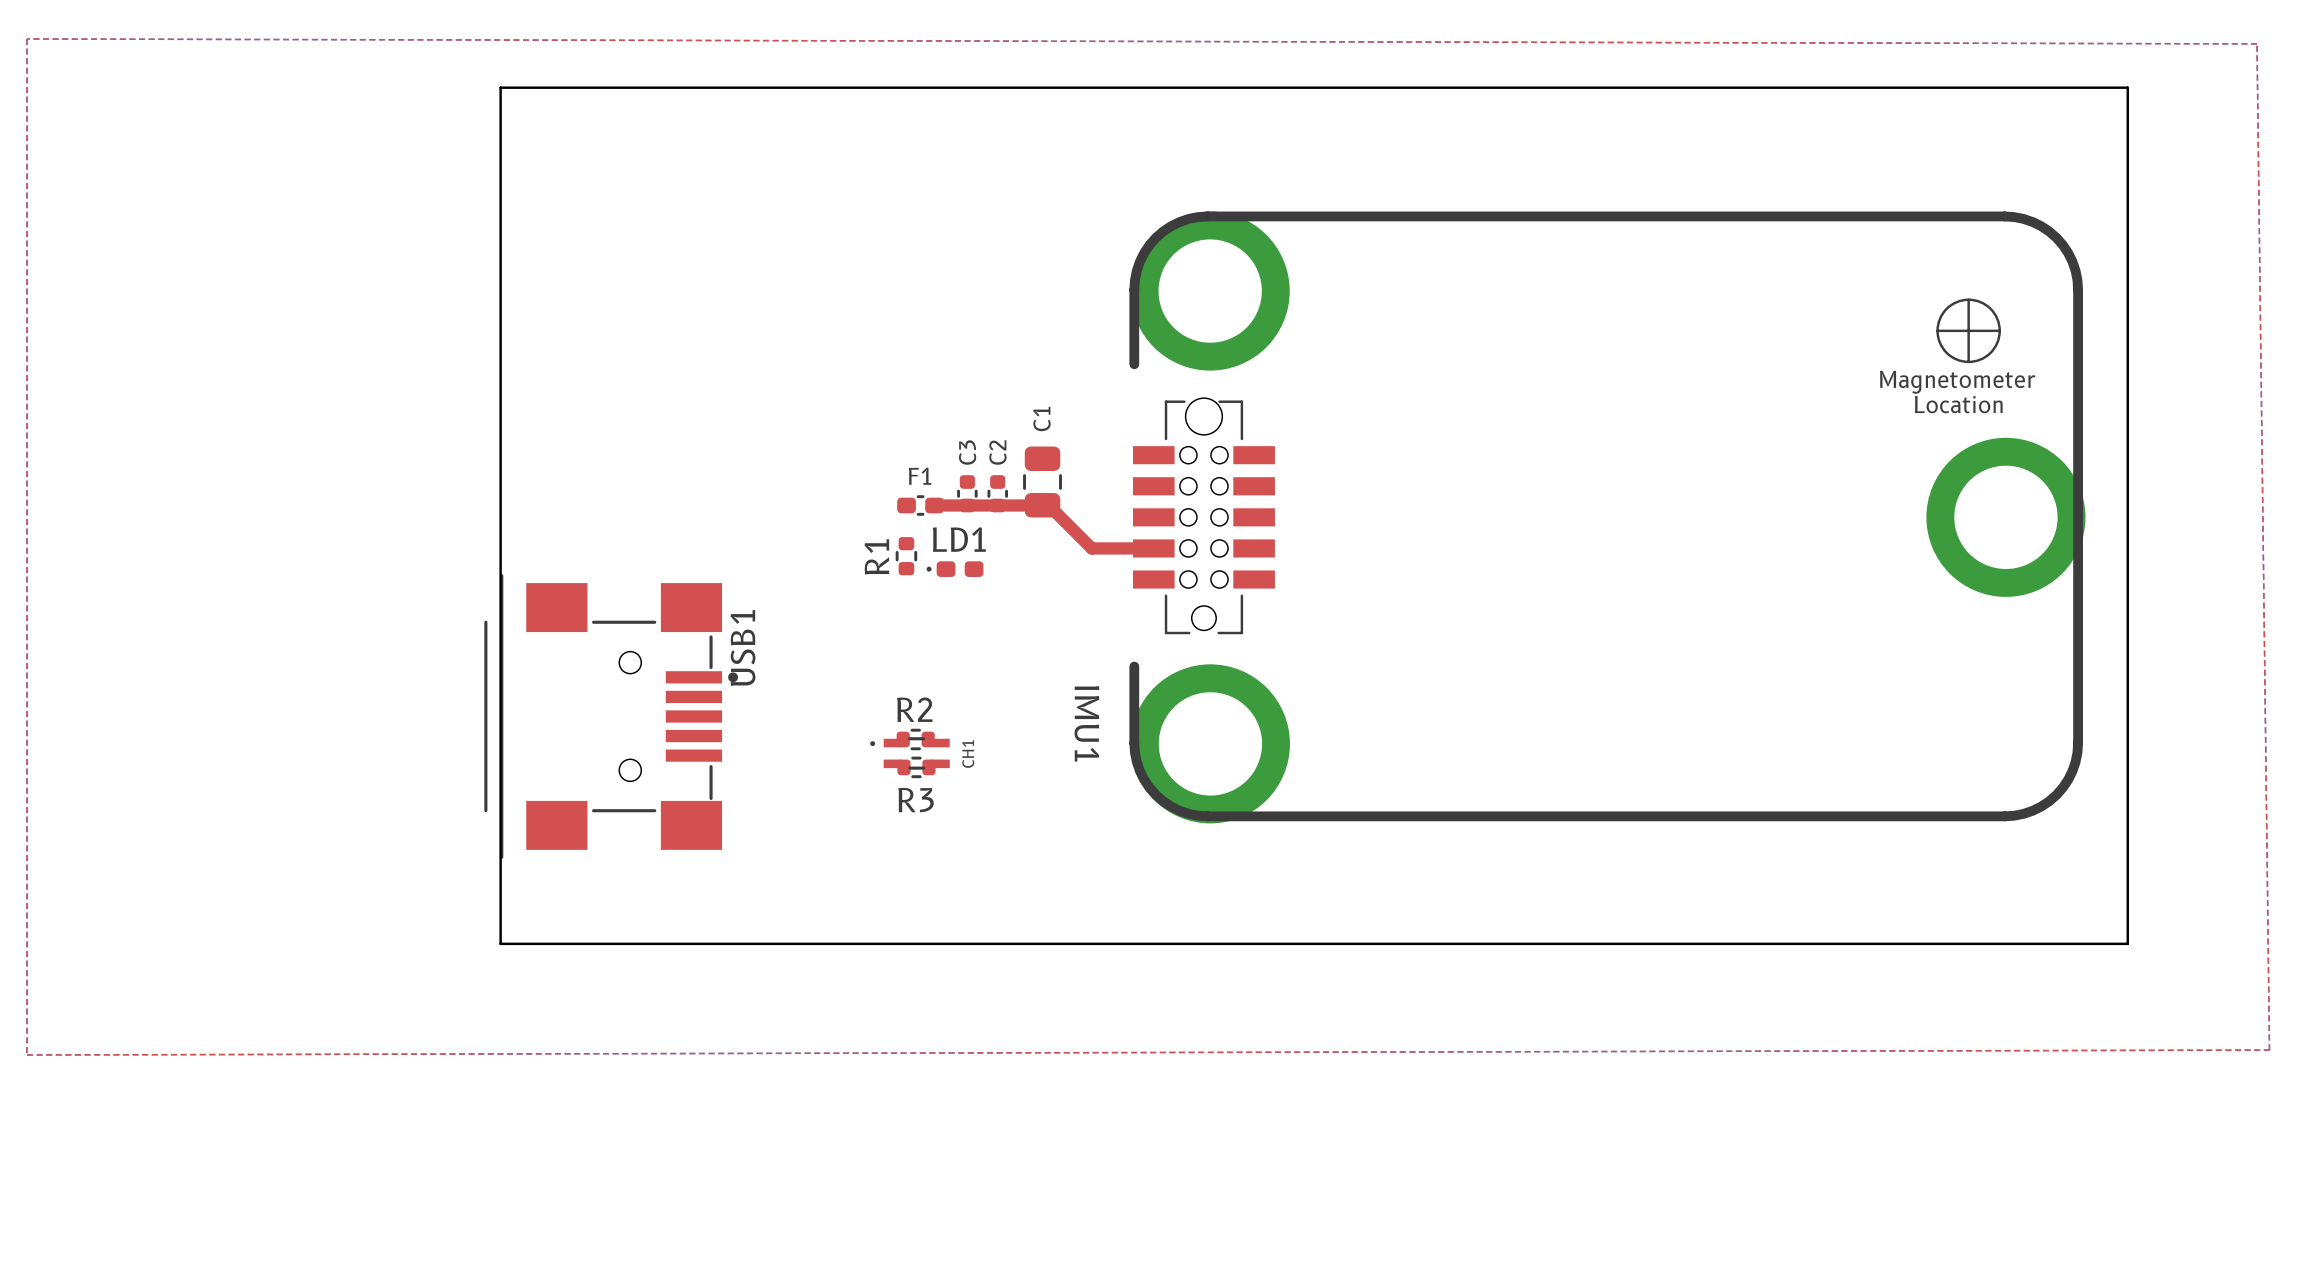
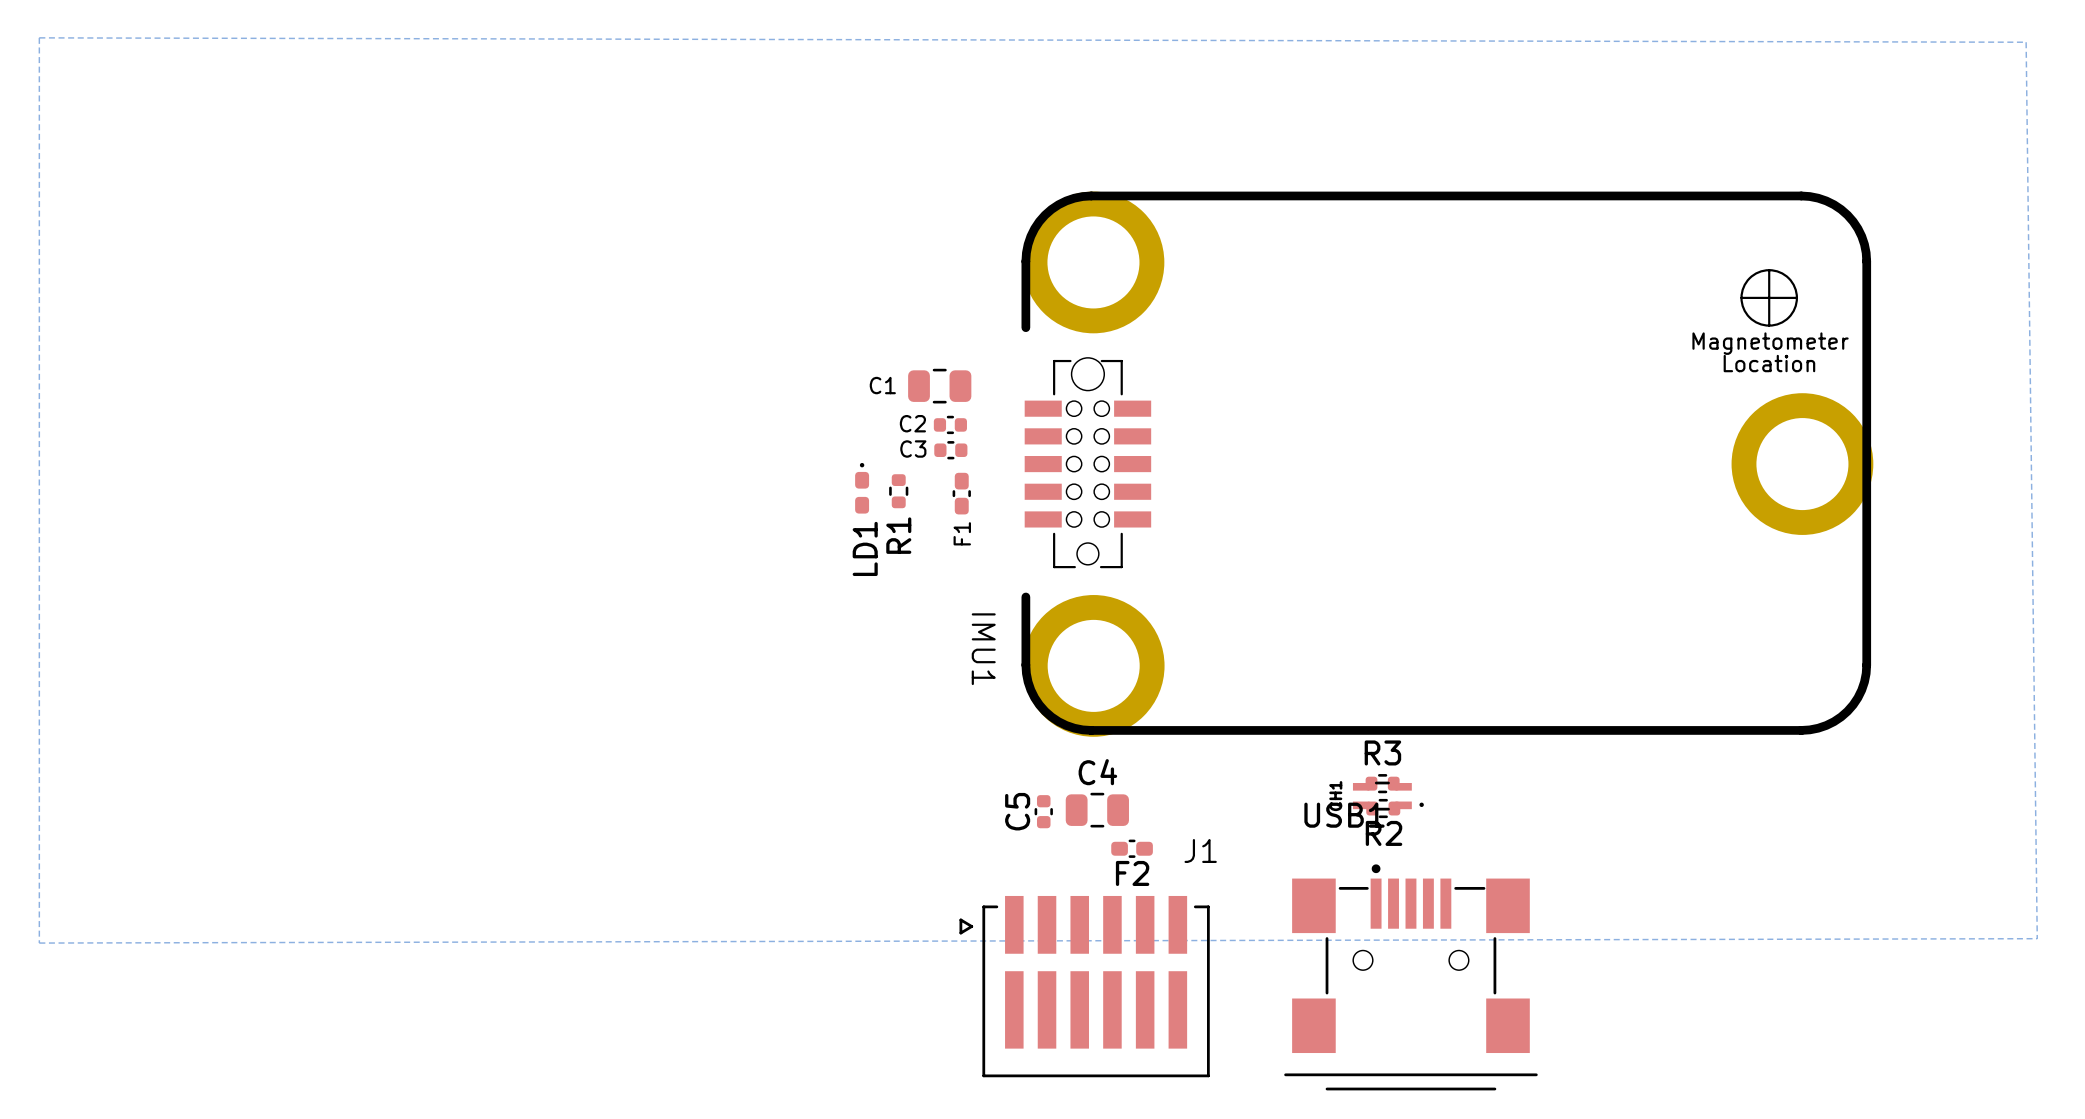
top zone outline: (27, 38) (27, 1054) (2269, 1050) (2257, 43) (27, 38) -> none
board edge: (500, 87) (2127, 87) (2127, 943) (500, 943) (500, 87) -> none
C1 name position: C1 (1041, 419) -> C1 (882, 385)
C3 name position: C3 (967, 452) -> C3 (913, 449)
C2 name position: C2 (997, 452) -> C2 (912, 423)
F1 name position: F1 (920, 476) -> F1 (962, 533)
C1 rotation: 0° (1042, 482) -> 90° clockwise (939, 386)
C1 position: (1042, 482) -> (939, 386)
C3 rotation: 0° (967, 493) -> 90° clockwise (950, 450)
C3 position: (967, 493) -> (950, 450)
C2 rotation: 0° (997, 493) -> 90° clockwise (950, 424)
C2 position: (997, 493) -> (950, 424)
F1 rotation: 0° (920, 505) -> 90° clockwise (961, 493)
F1 position: (920, 505) -> (961, 493)
top track: (934, 505) (1042, 505) -> none
top track: (1042, 505) (1048, 505) (1091, 548) (1153, 548) -> none
LD1 name position: LD1 (959, 539) -> LD1 (865, 548)
R1 name position: R1 (876, 556) -> R1 (898, 535)
R1 position: (906, 556) -> (898, 491)
LD1 rotation: 0° (955, 569) -> 90° clockwise (862, 488)
R2 name position: R2 (914, 709) -> R2 (1384, 833)
USB1 rotation: 0° (611, 716) -> 90° counterclockwise (1410, 977)
USB1 position: (611, 716) -> (1410, 977)
R2 position: (915, 739) -> (1383, 808)
CH1 rotation: 0° (909, 753) -> 180° (1388, 796)
CH1 position: (909, 753) -> (1388, 796)
R3 position: (916, 767) -> (1382, 783)
R3 name position: R3 (916, 800) -> R3 (1382, 752)
C4: none -> (1097, 810)
C5: none -> (1043, 811)
F2: none -> (1132, 848)
J1: none -> (1084, 986)

